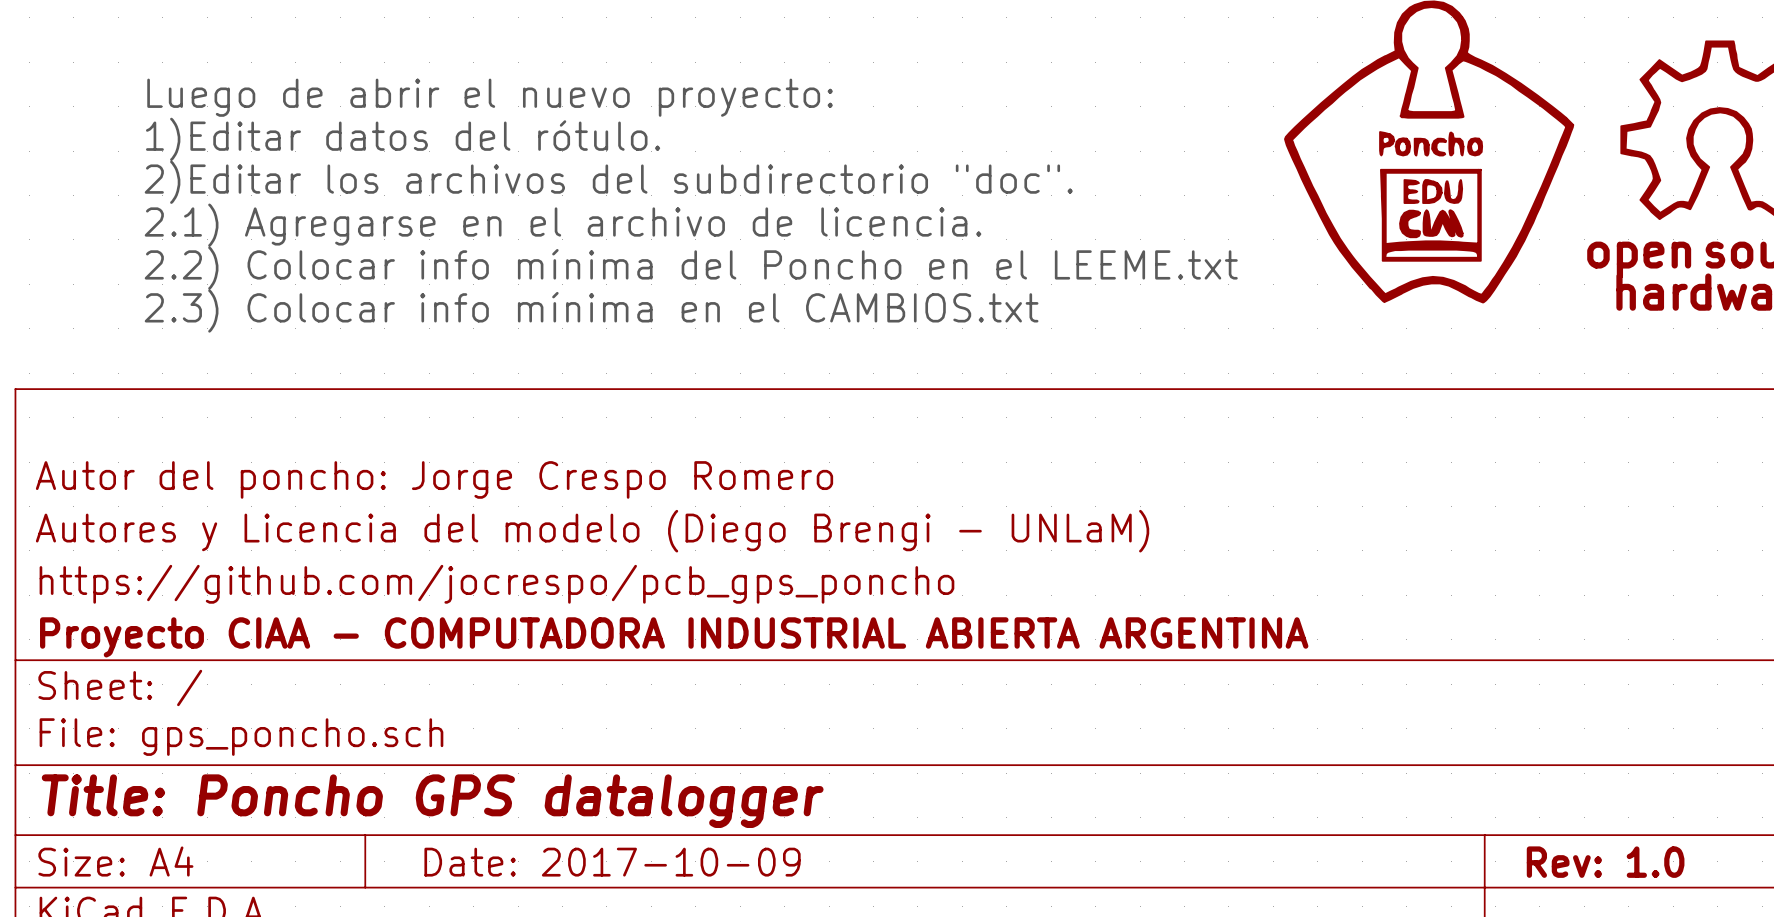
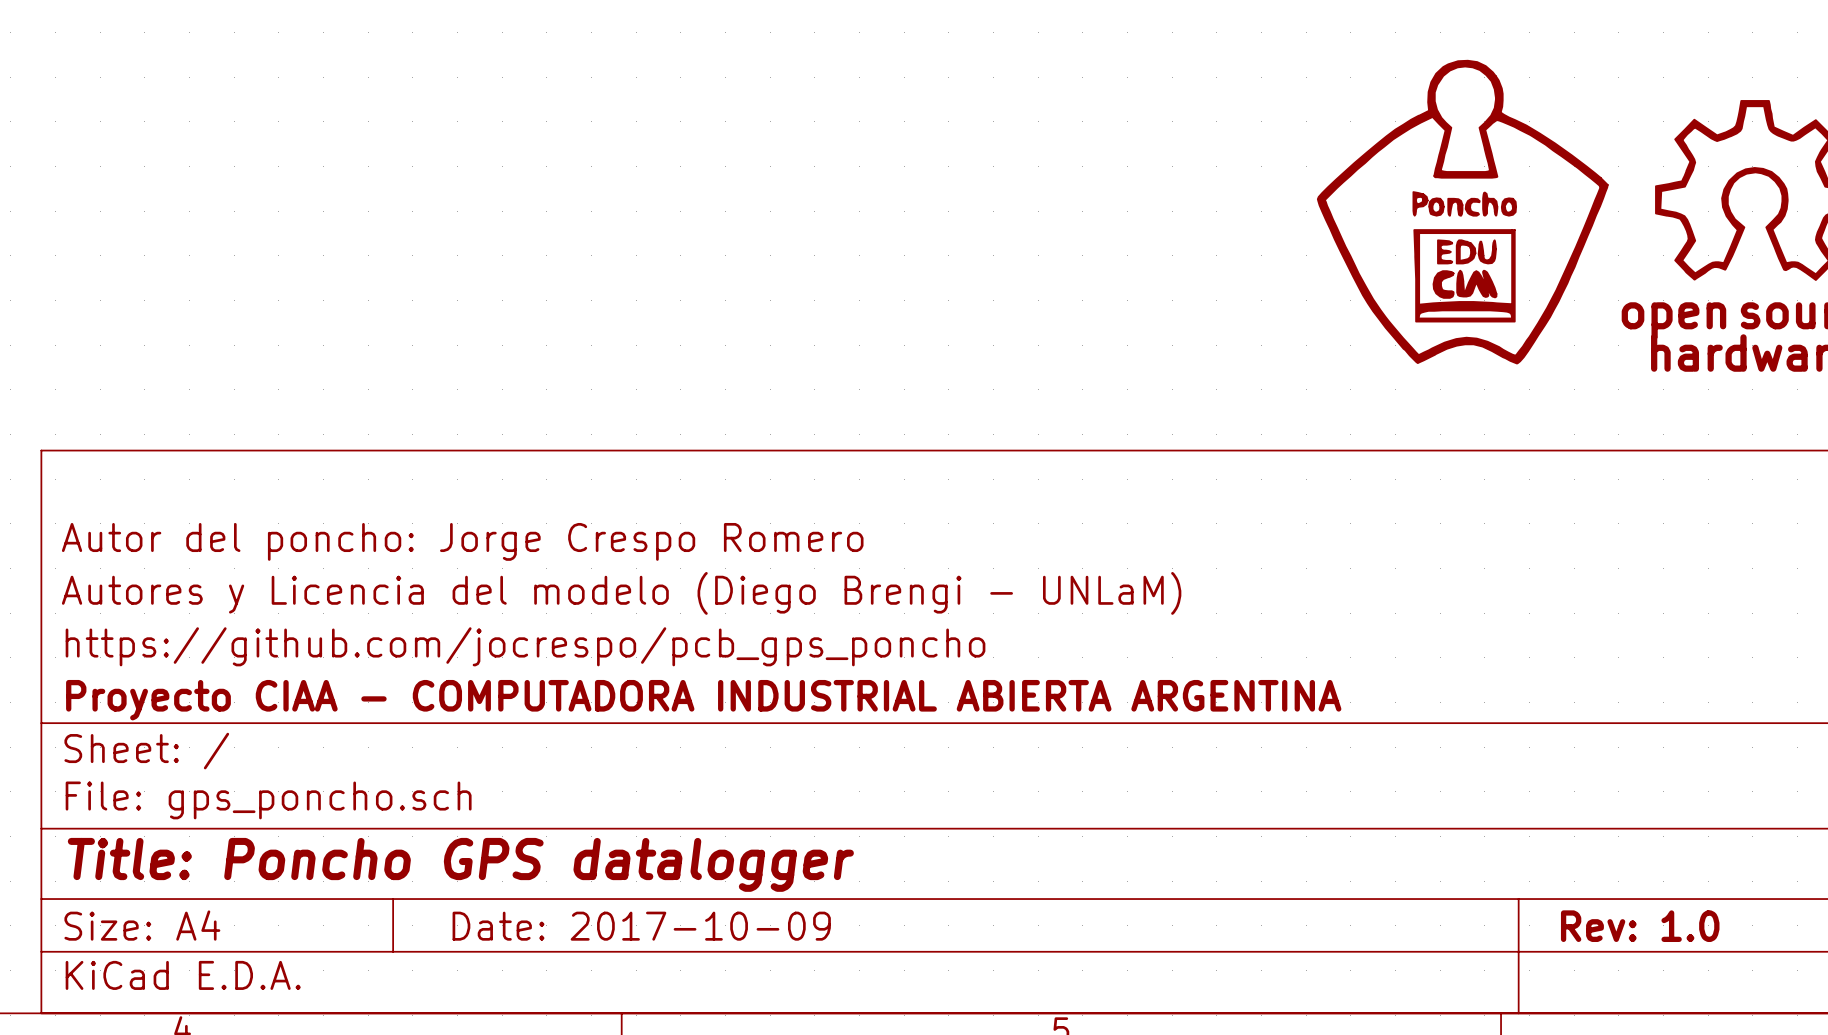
text: Luego de abrir el nuevo proyecto: (490, 97) -> none
text: 1)Editar datos del rótulo. (403, 139) -> none
text: 2)Editar los archivos del subdirectorio "doc". (608, 182) -> none
text: 2.1) Agregarse en el archivo de licencia. (563, 225) -> none
text: 2.2) Colocar info mínima del Poncho en el LEEME.txt (691, 268) -> none
text: 2.3) Colocar info mínima en el CAMBIOS.txt (591, 311) -> none

